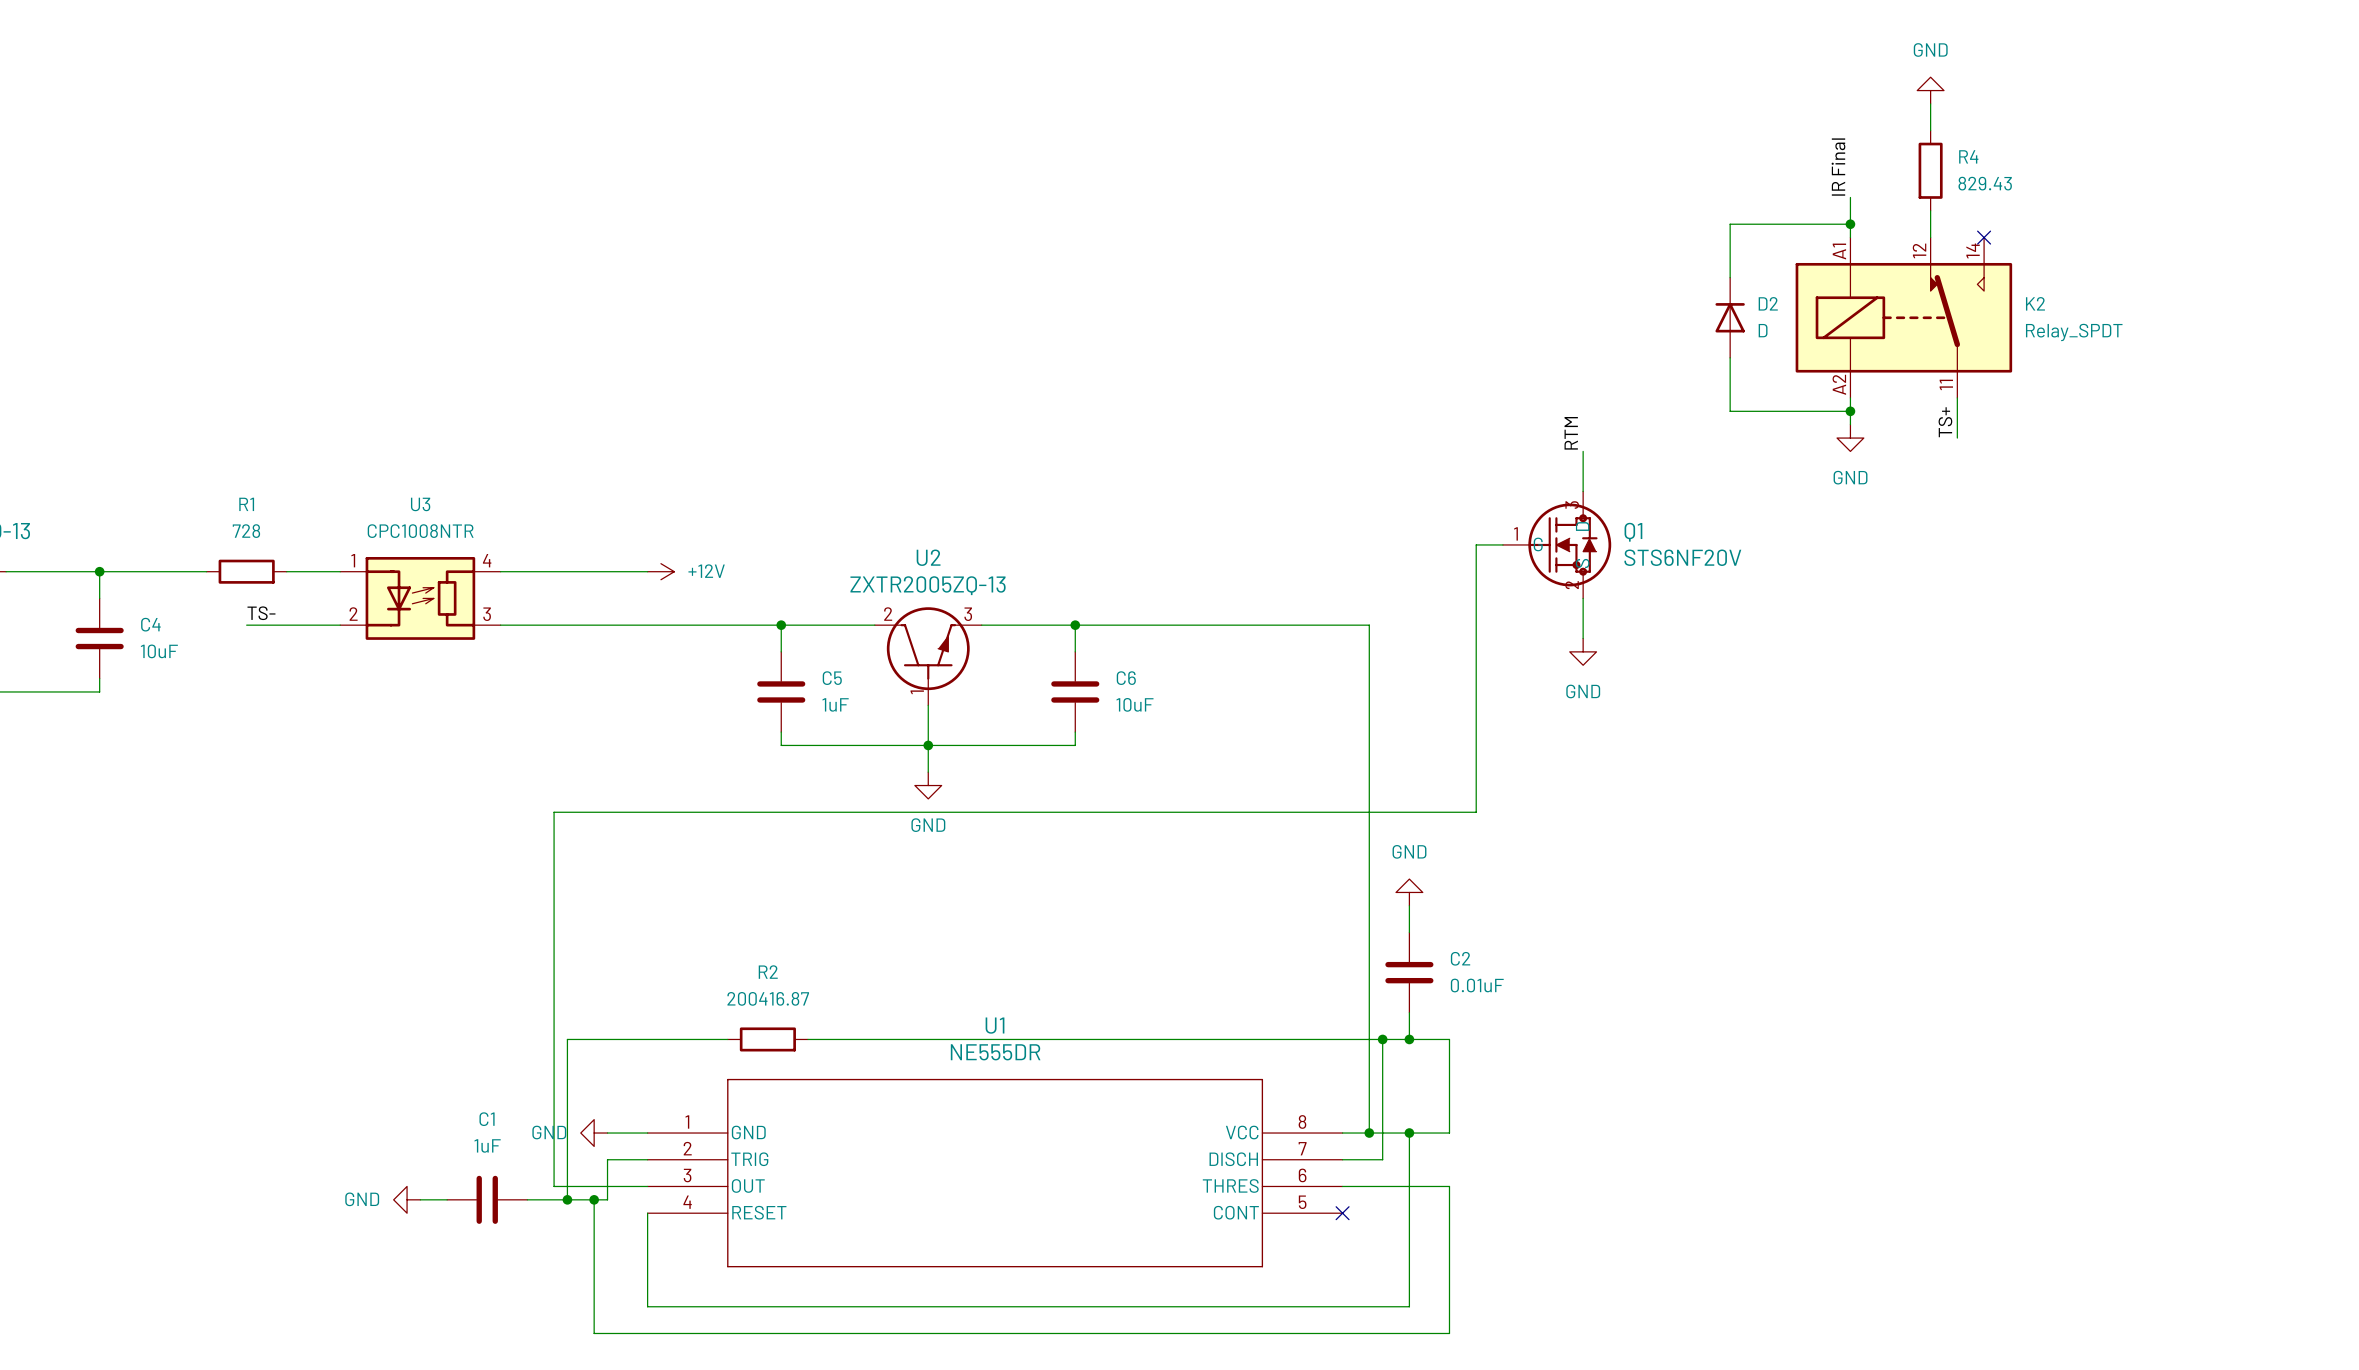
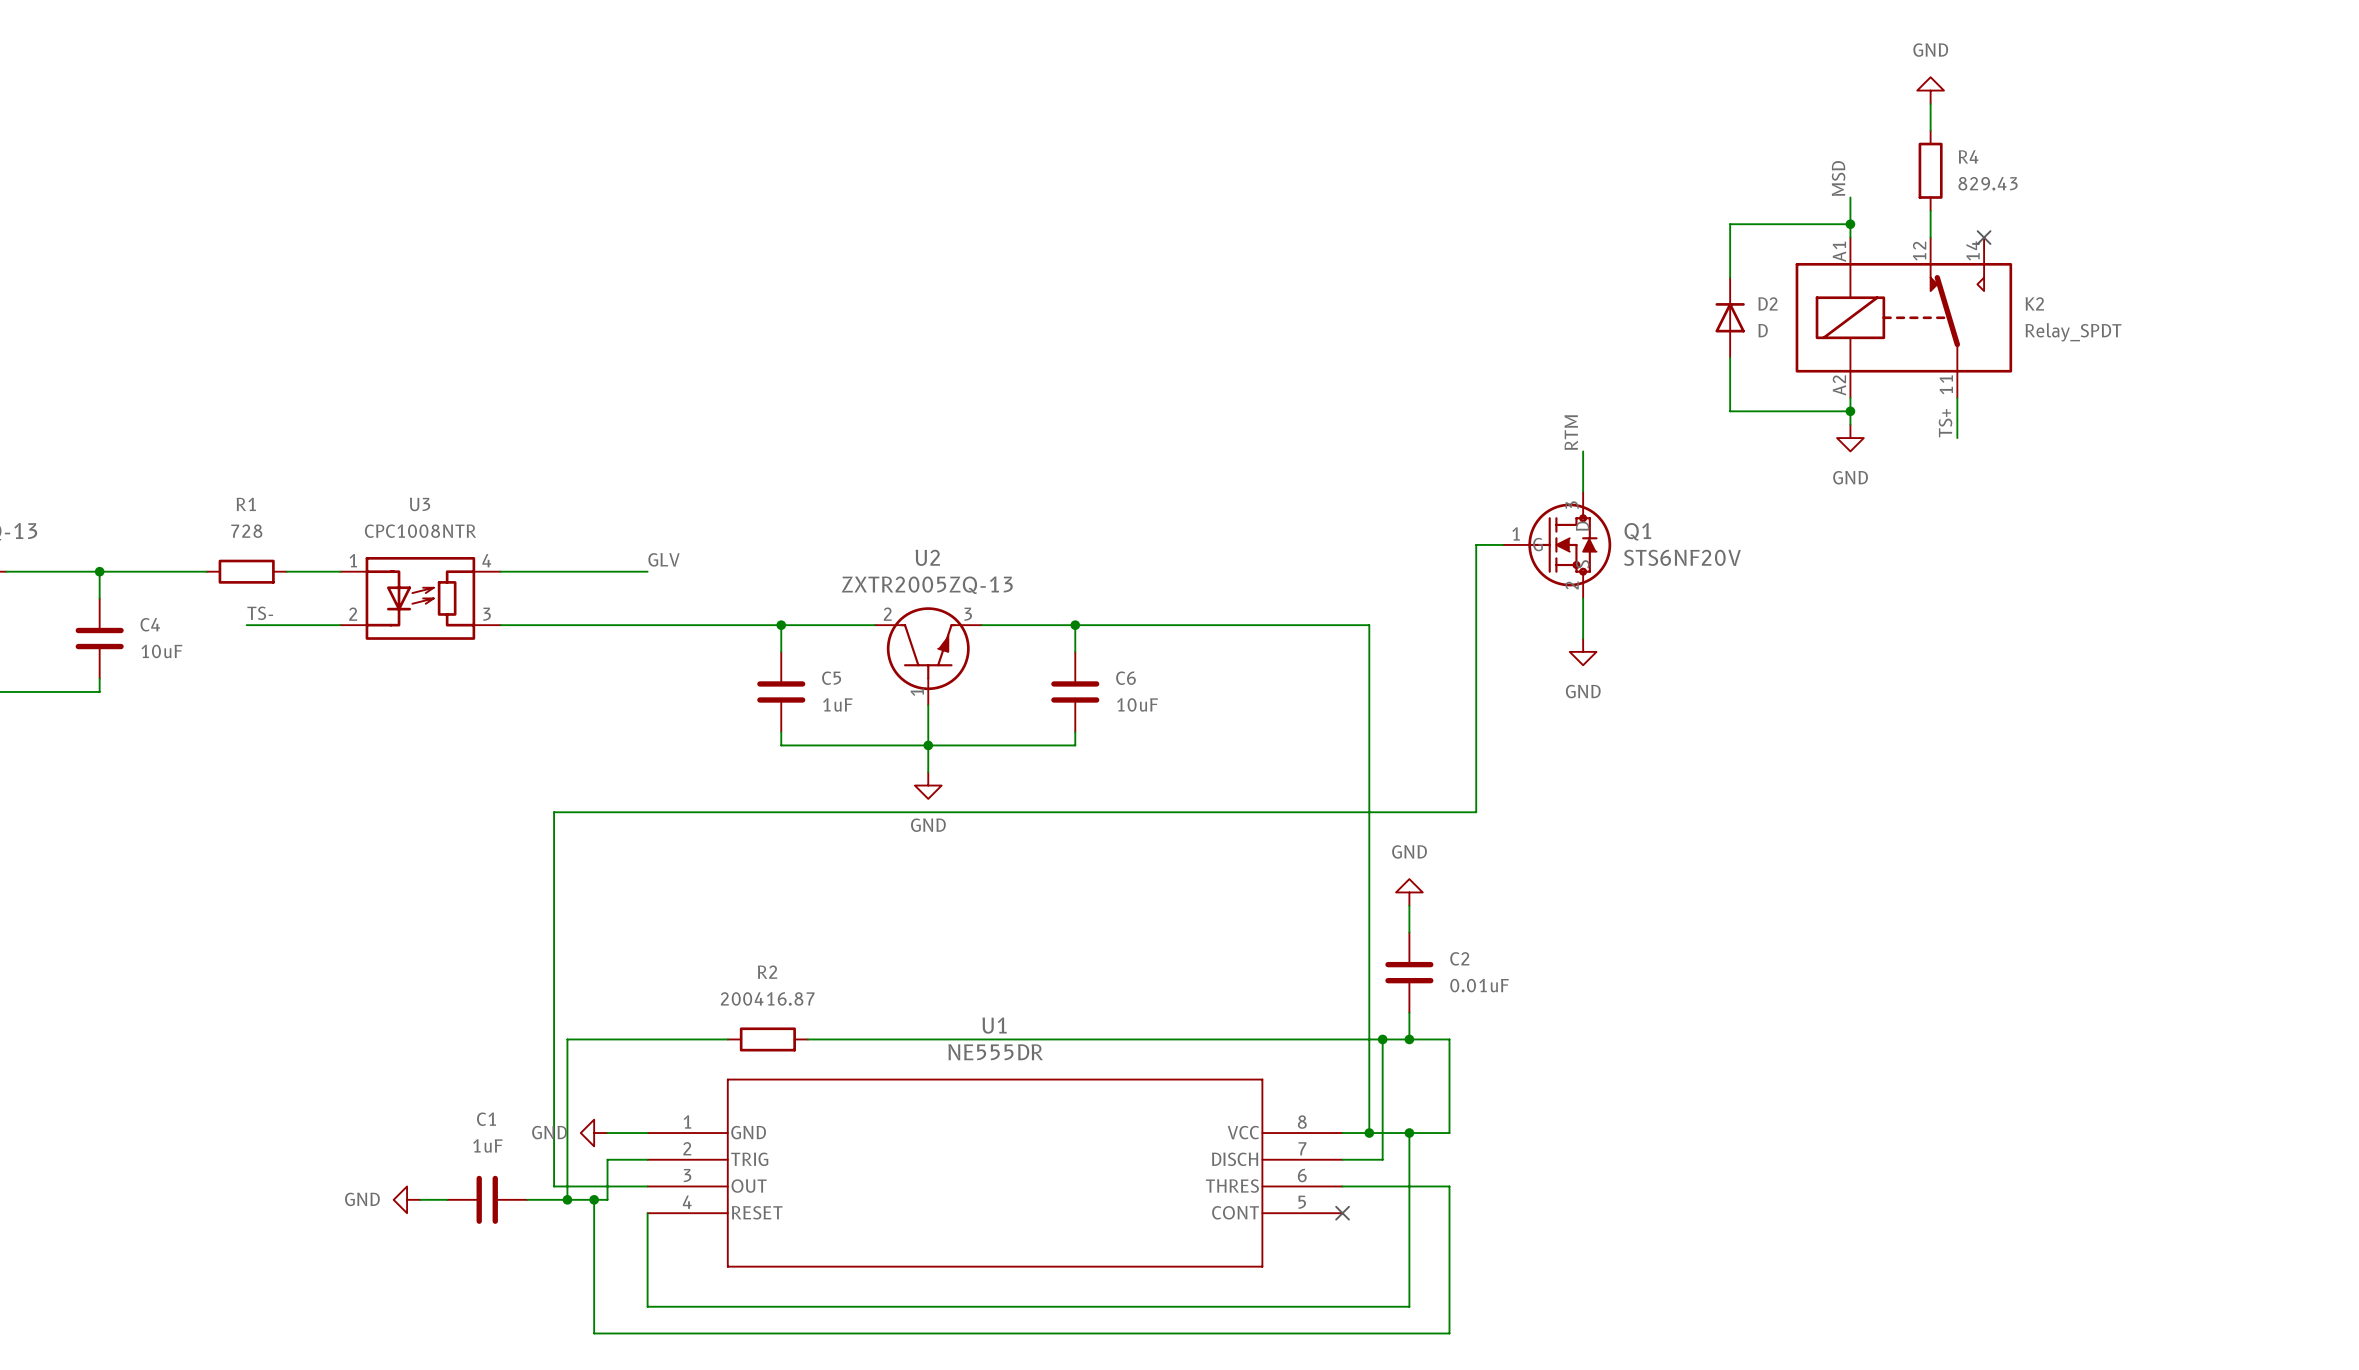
label: IR Final (1838, 167) -> MSD (1838, 178)
label: none -> GLV (664, 559)
power symbol: +12V (660, 571) -> none

